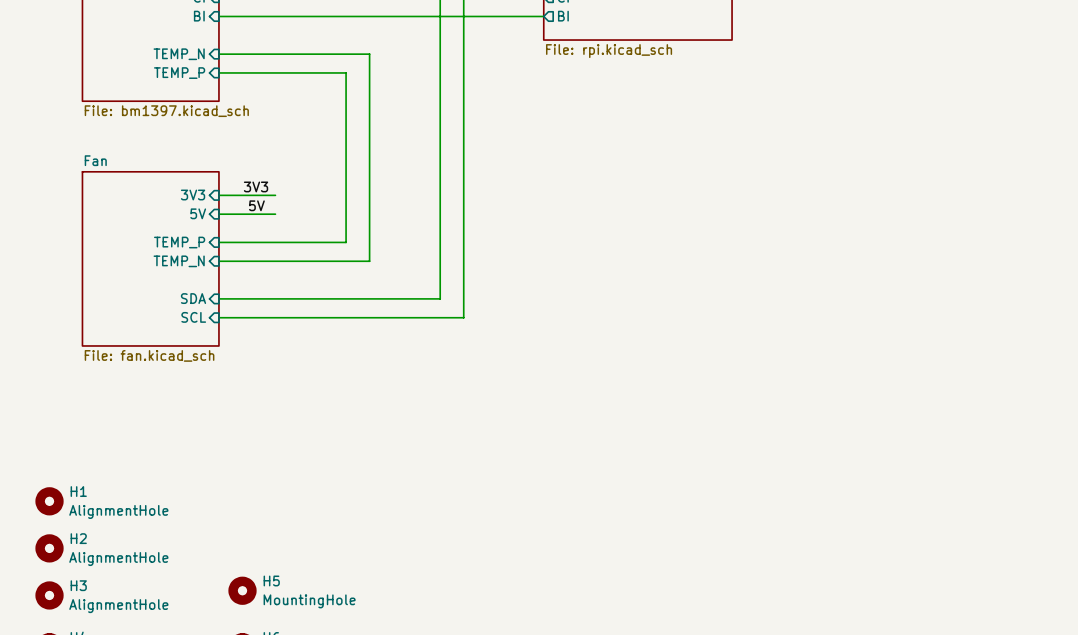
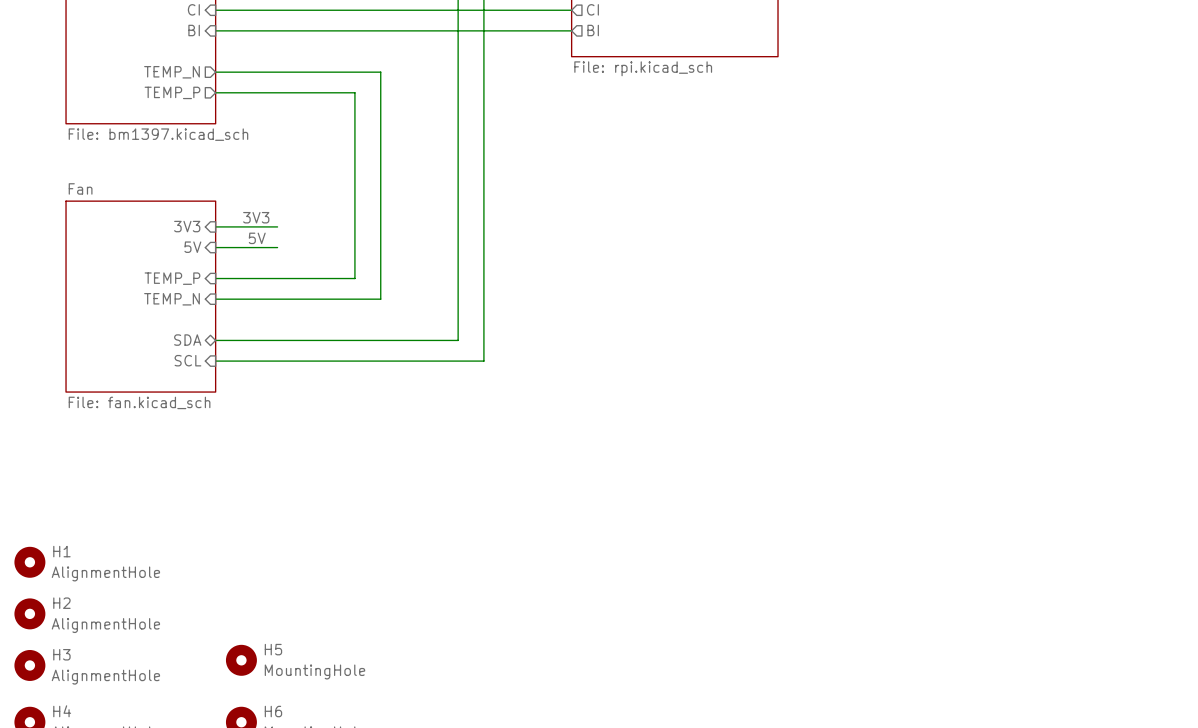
sheet pin shape: input (179, 54) -> output (171, 72)
sheet pin shape: input (179, 73) -> output (172, 92)
sheet pin shape: input (193, 298) -> bidirectional (187, 340)

